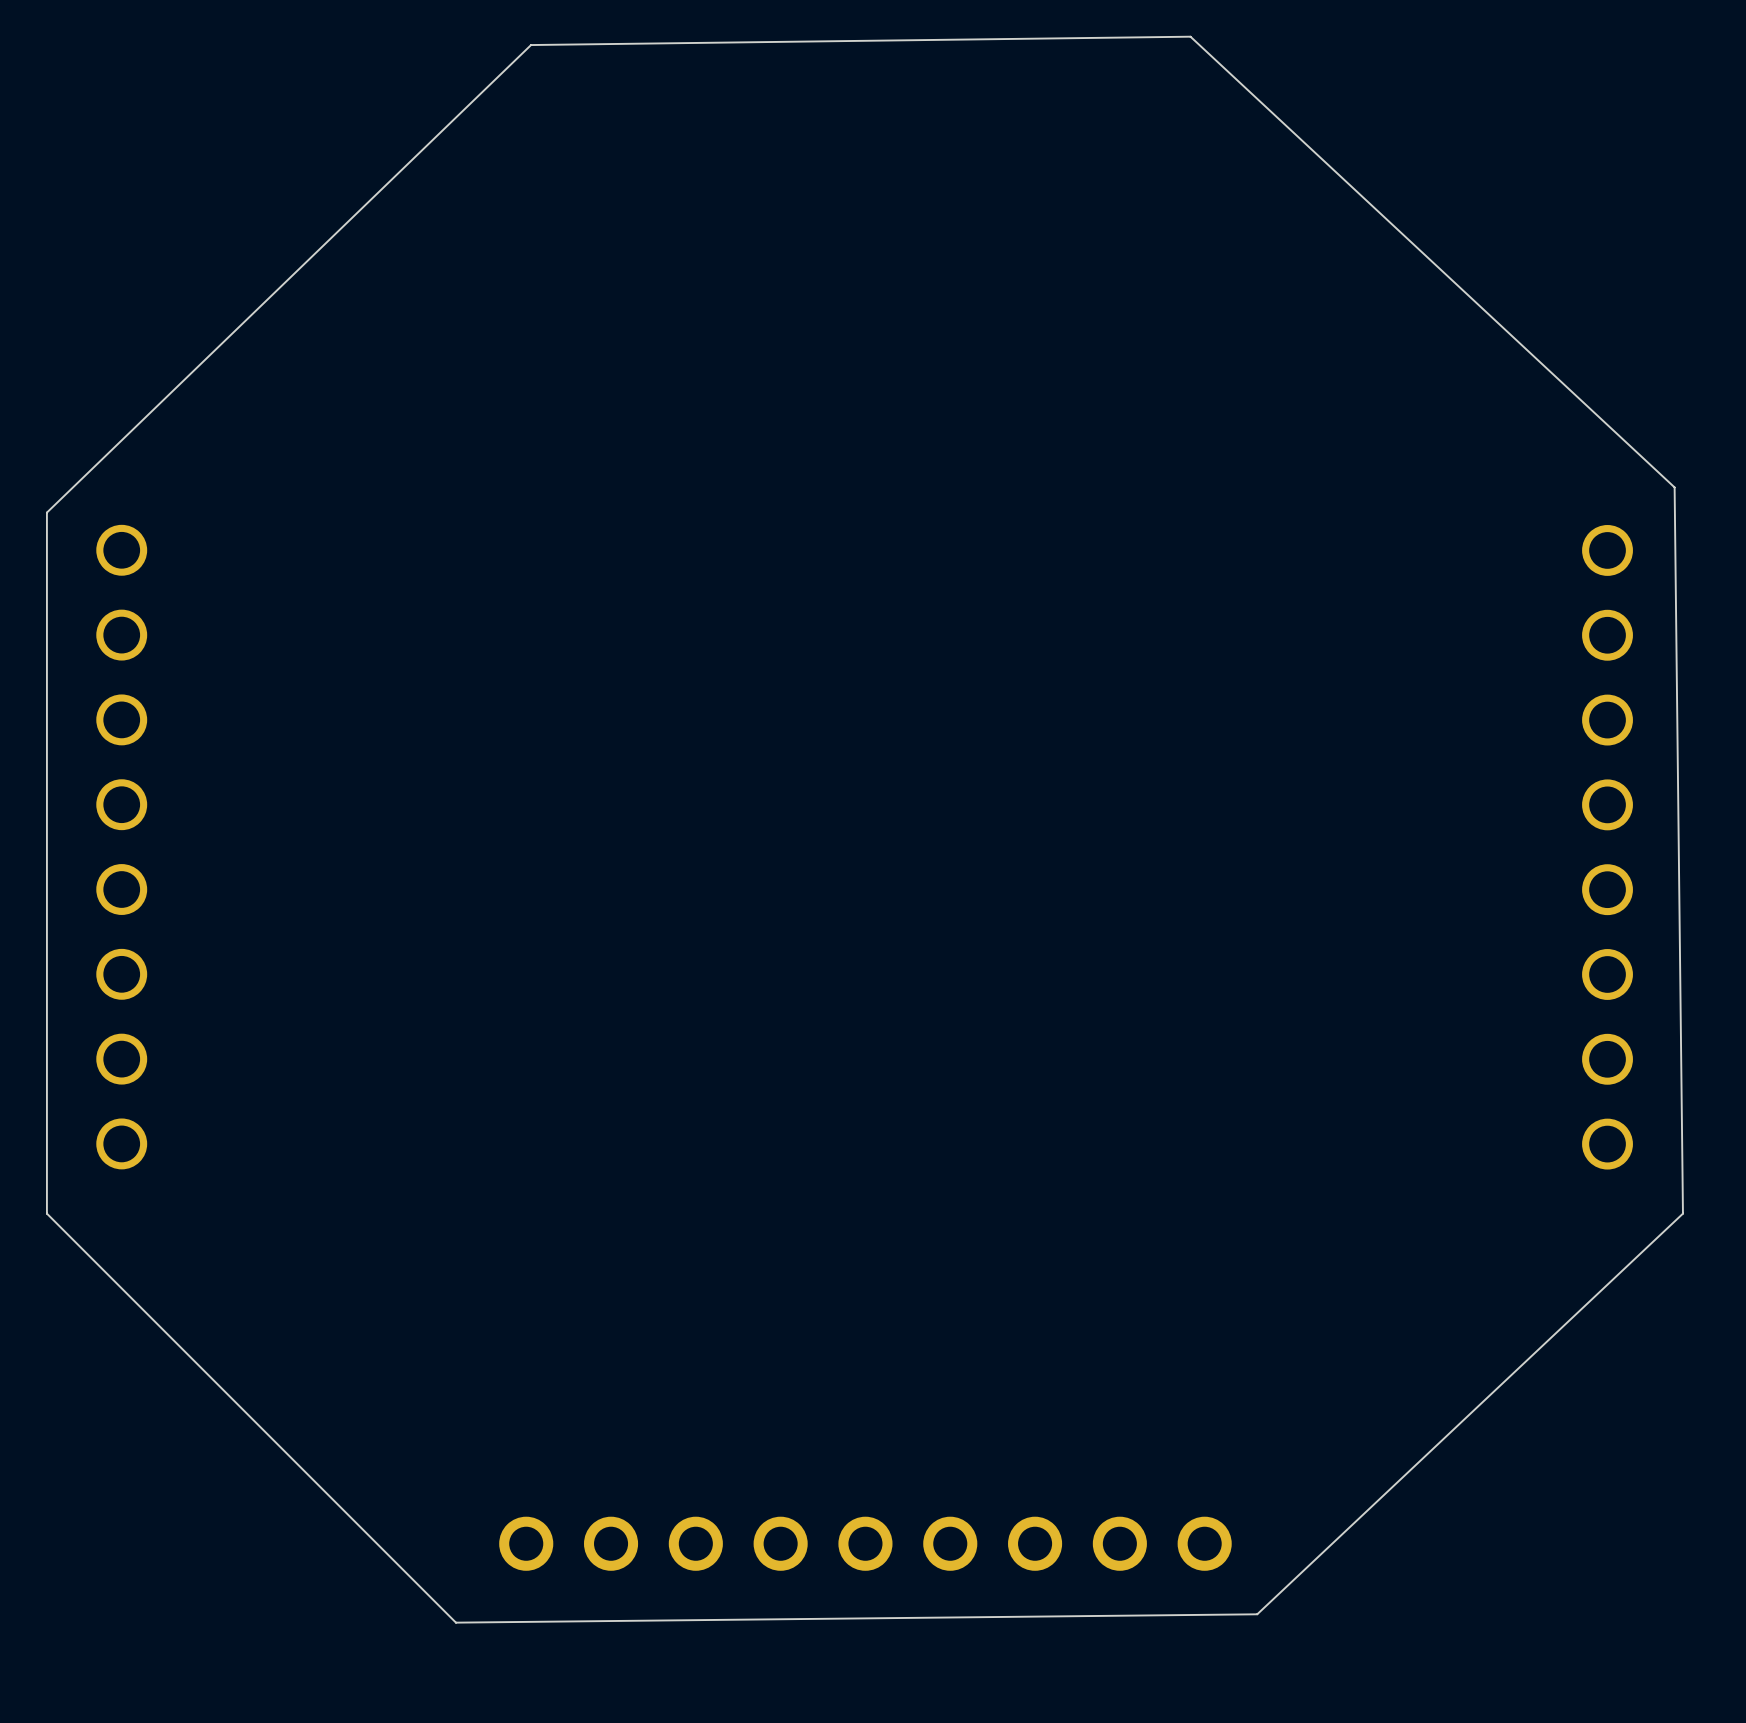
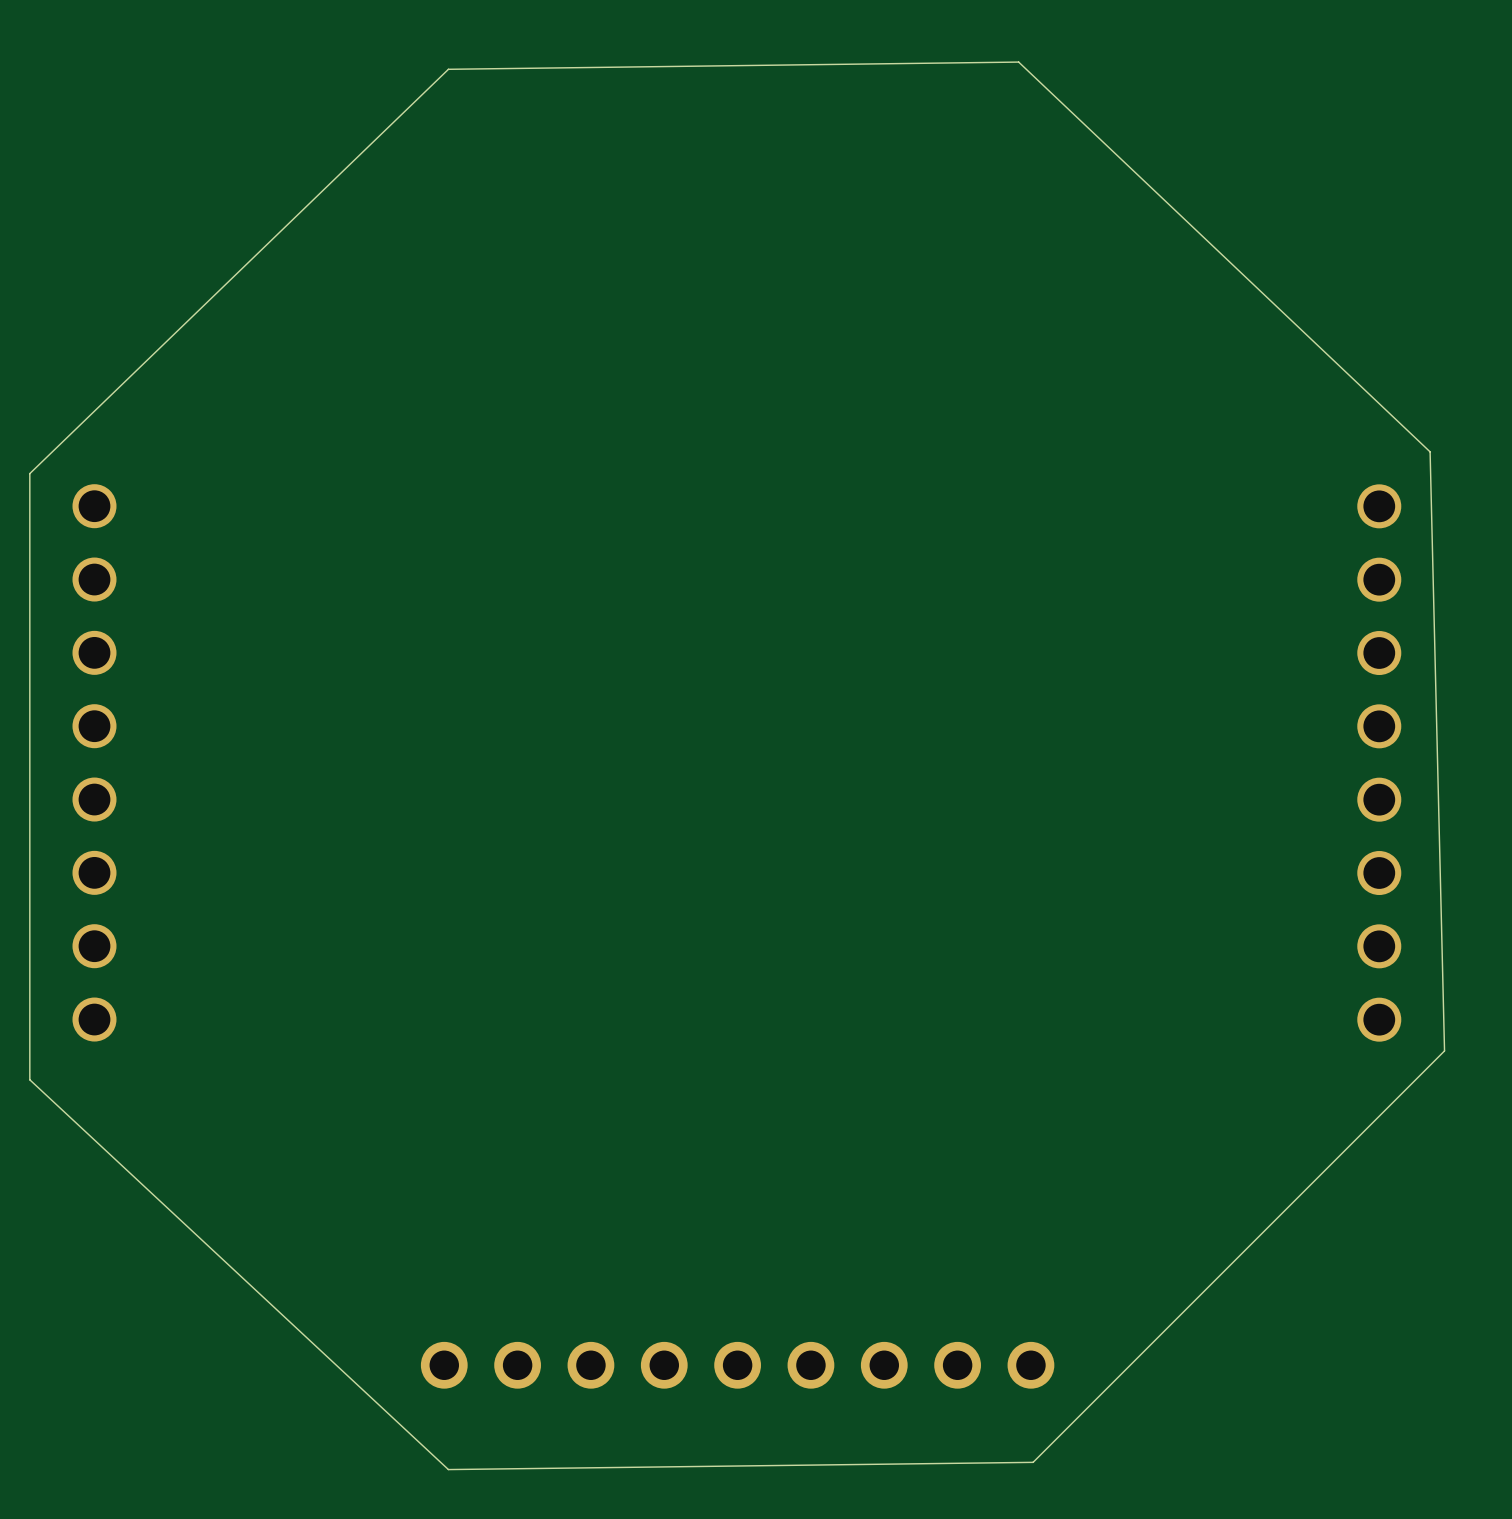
board edge: (1190, 36) (1674, 487) (1682, 1213) (1257, 1614) (455, 1622) (46, 1213) -> (1018, 62) (1430, 451) (1444, 1050) (1033, 1462) (448, 1469) (29, 1079)

